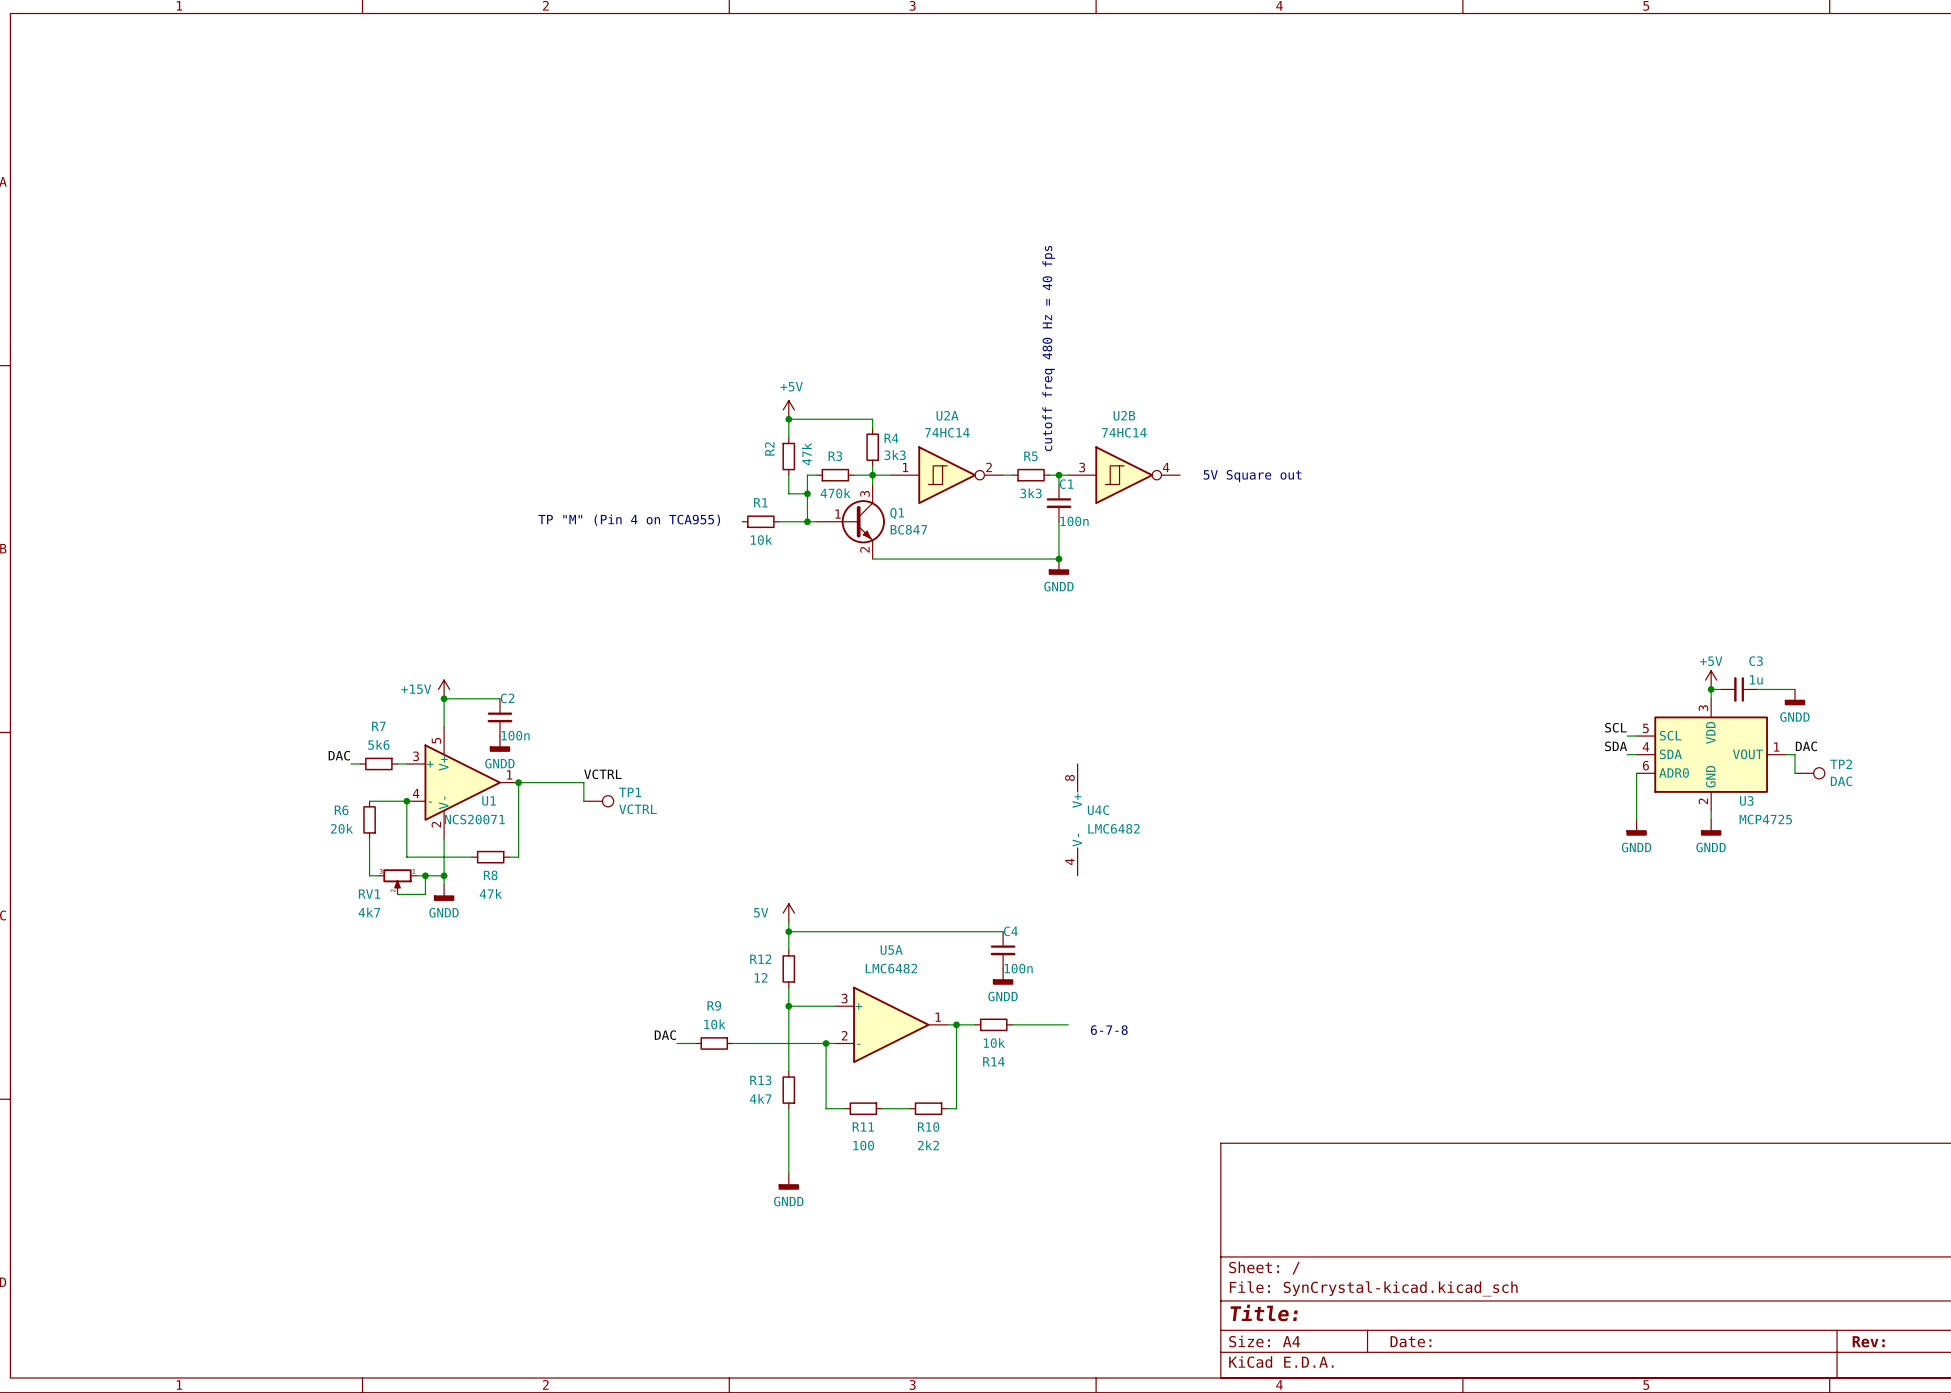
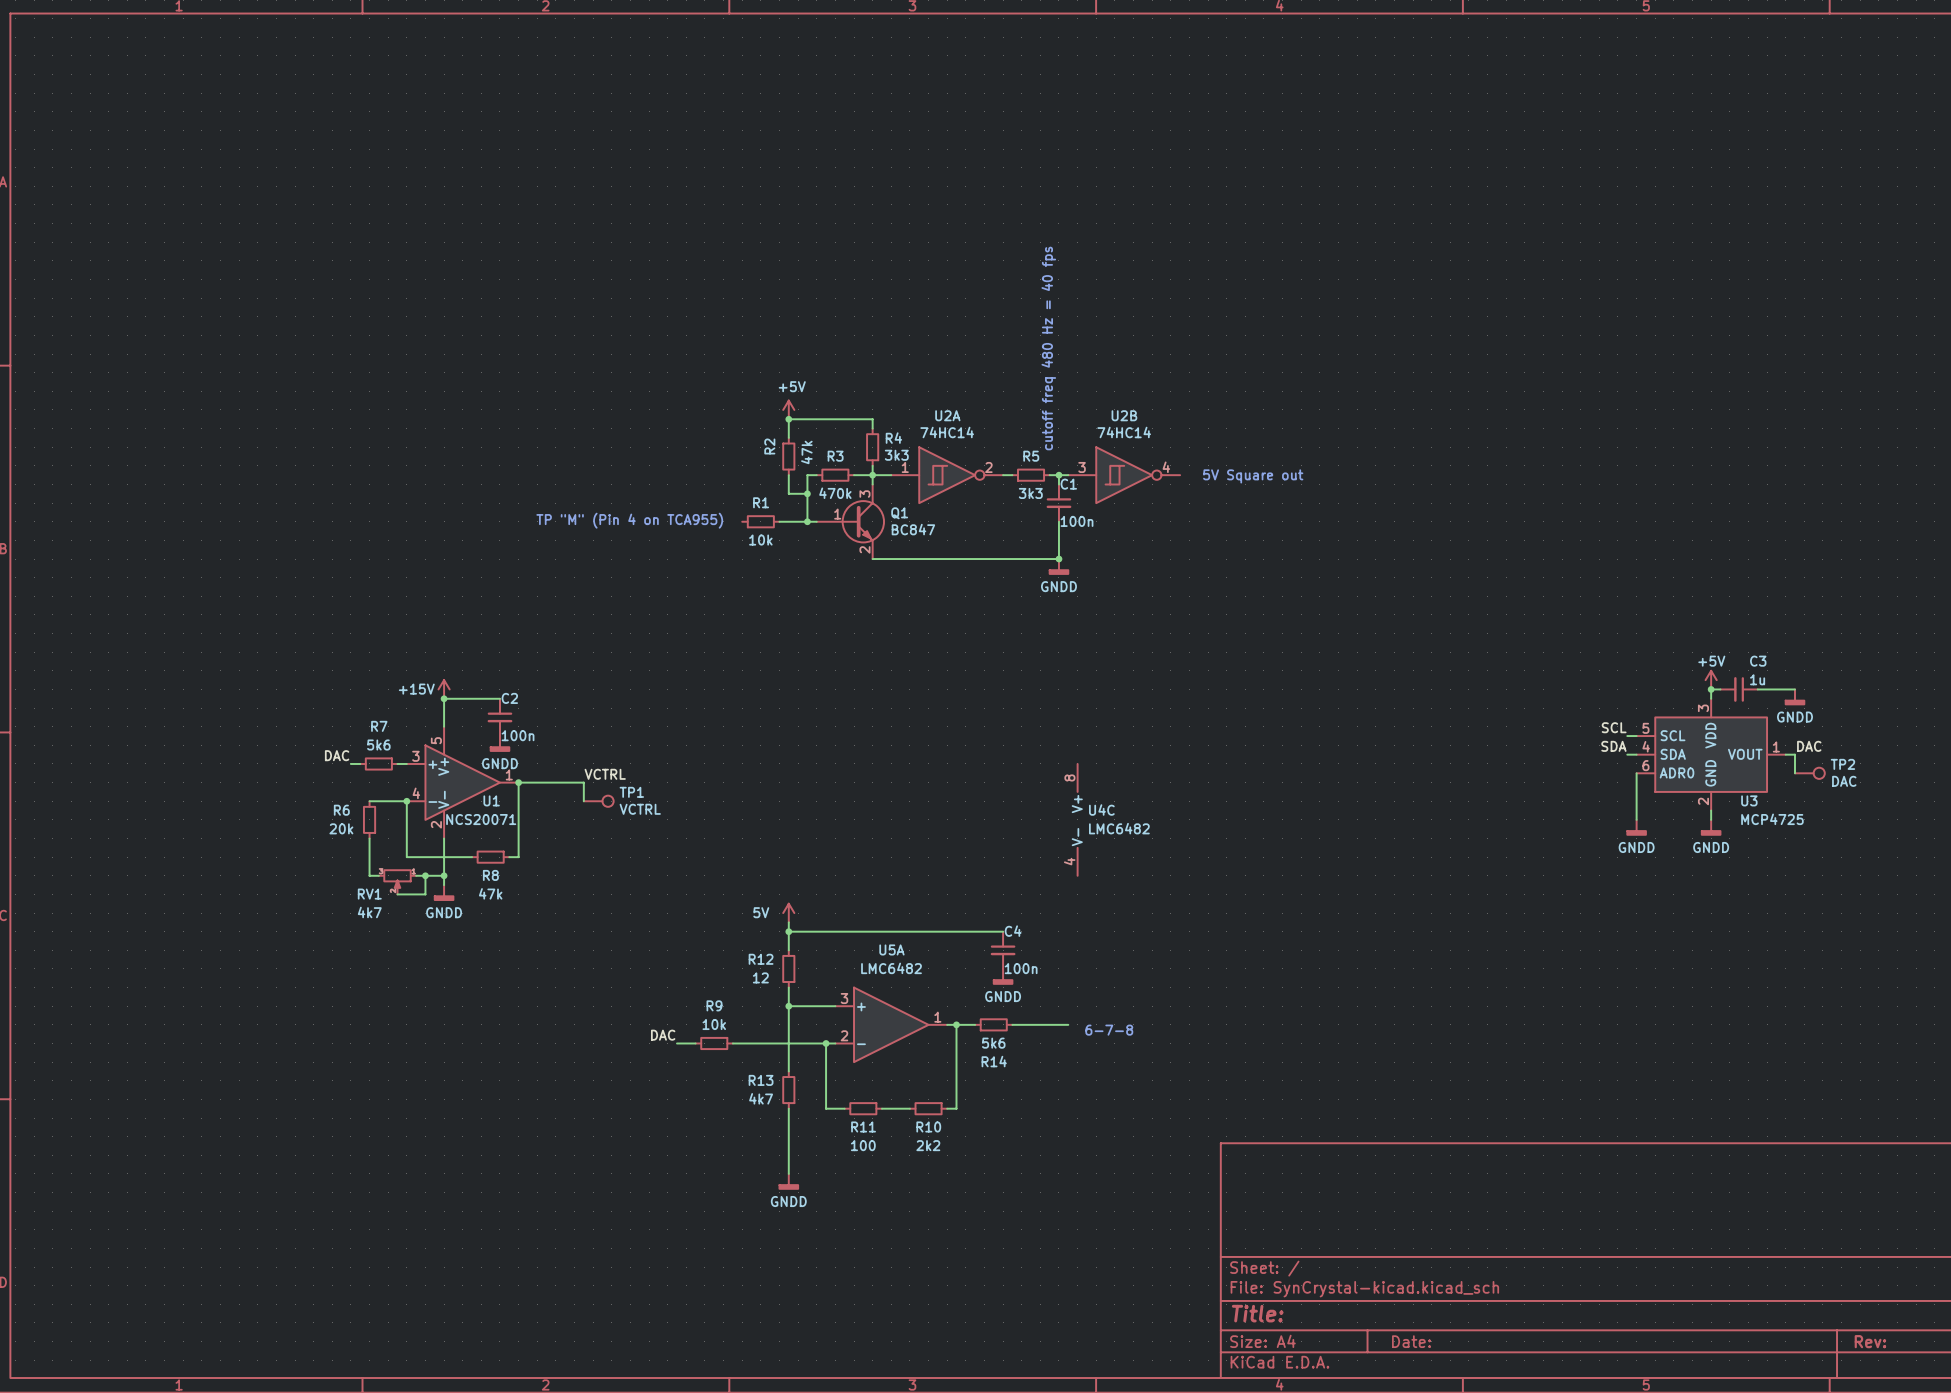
R14 value: 10k (994, 1043) -> 5k6 (993, 1043)

